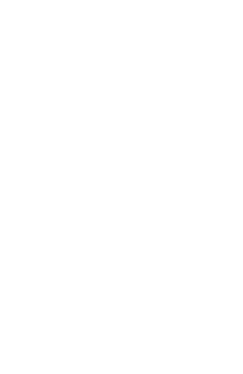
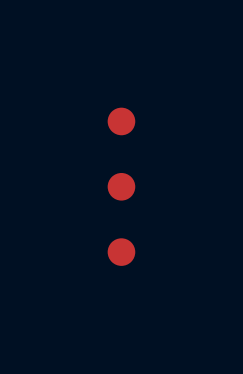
part: none -> (121, 121)
part: none -> (121, 186)
part: none -> (121, 252)

